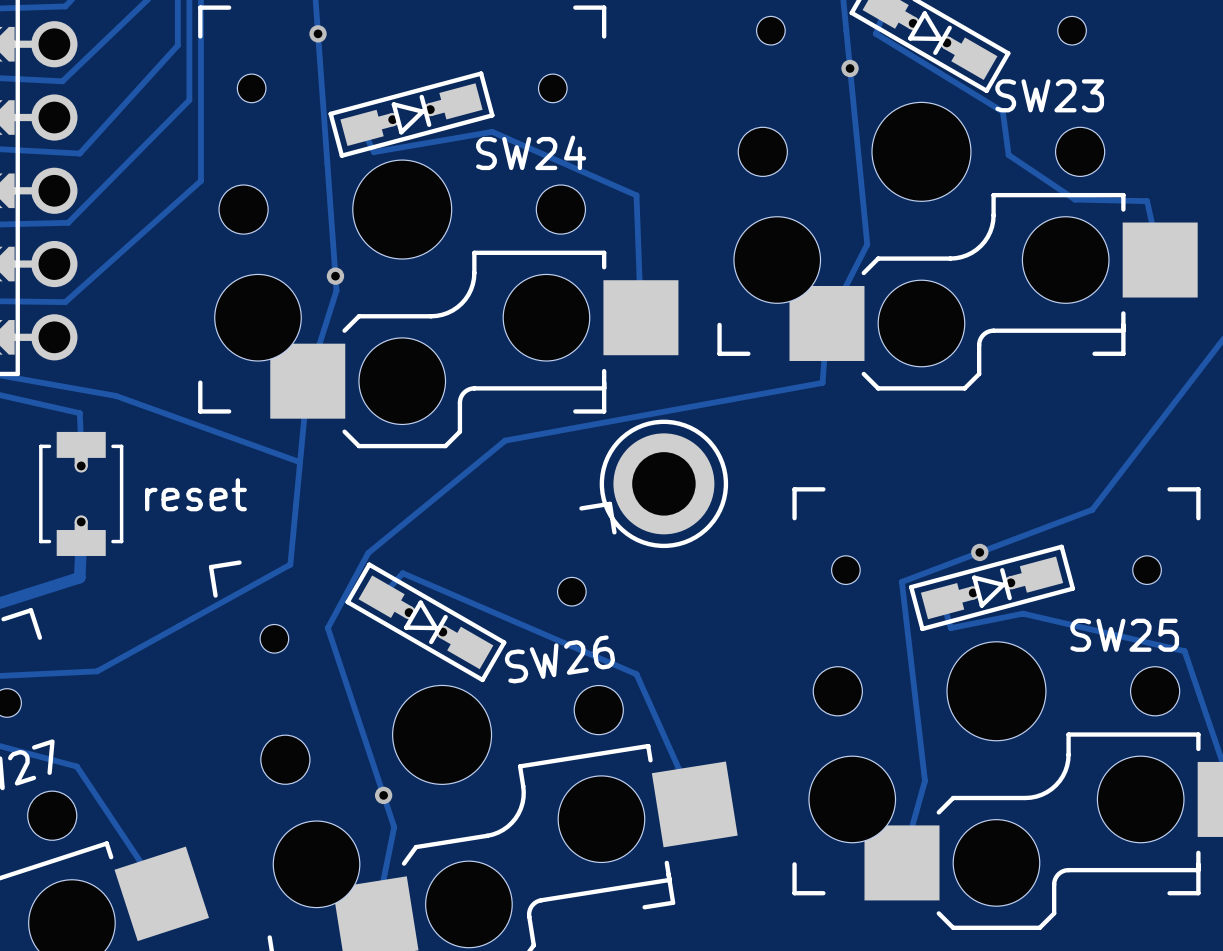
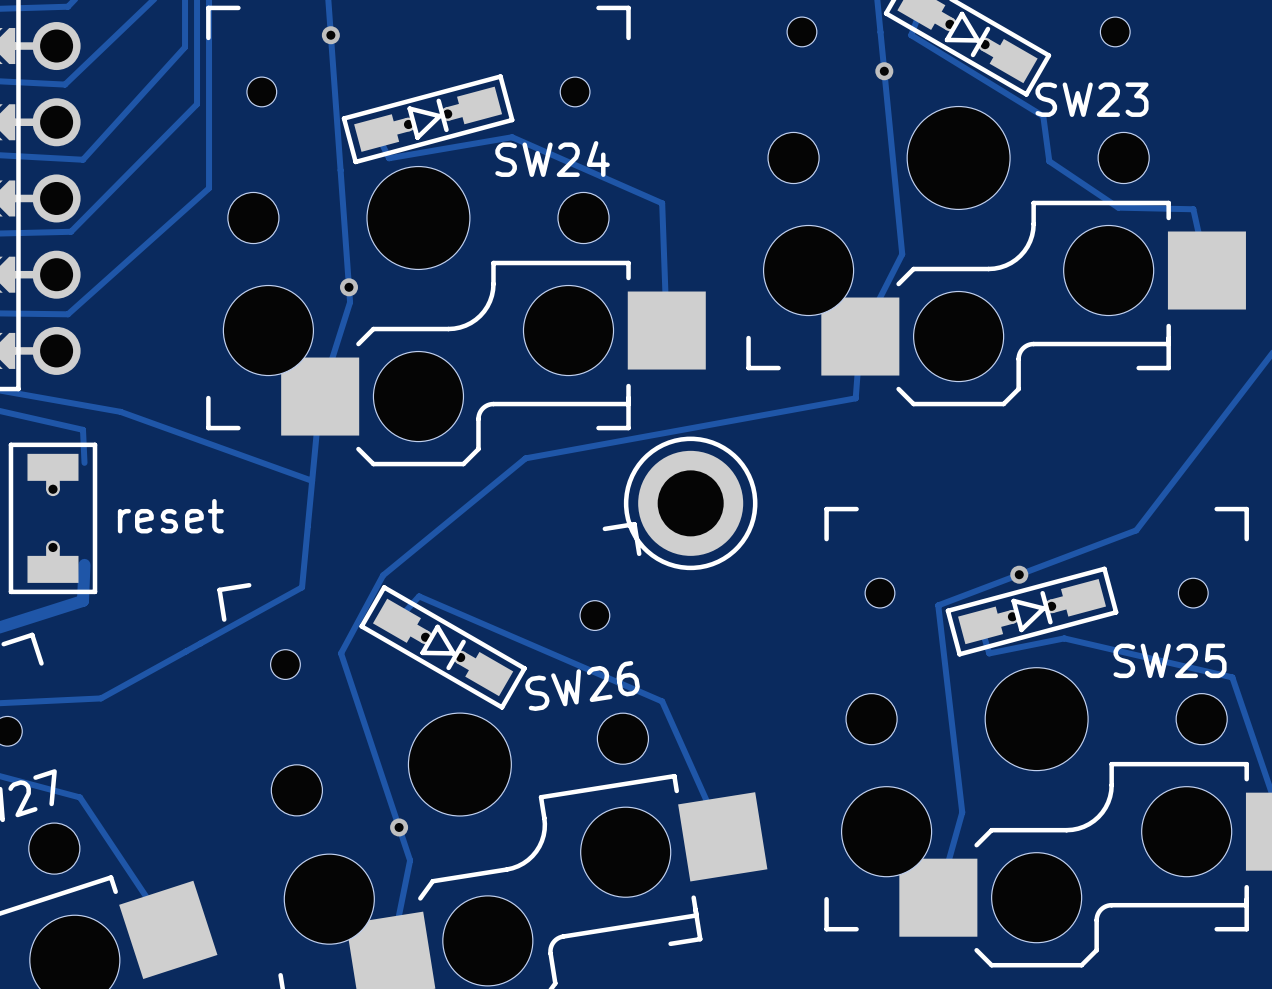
part: (81, 493) -> none
text position: reset (195, 494) -> reset (170, 516)
part: none -> (52, 518)

